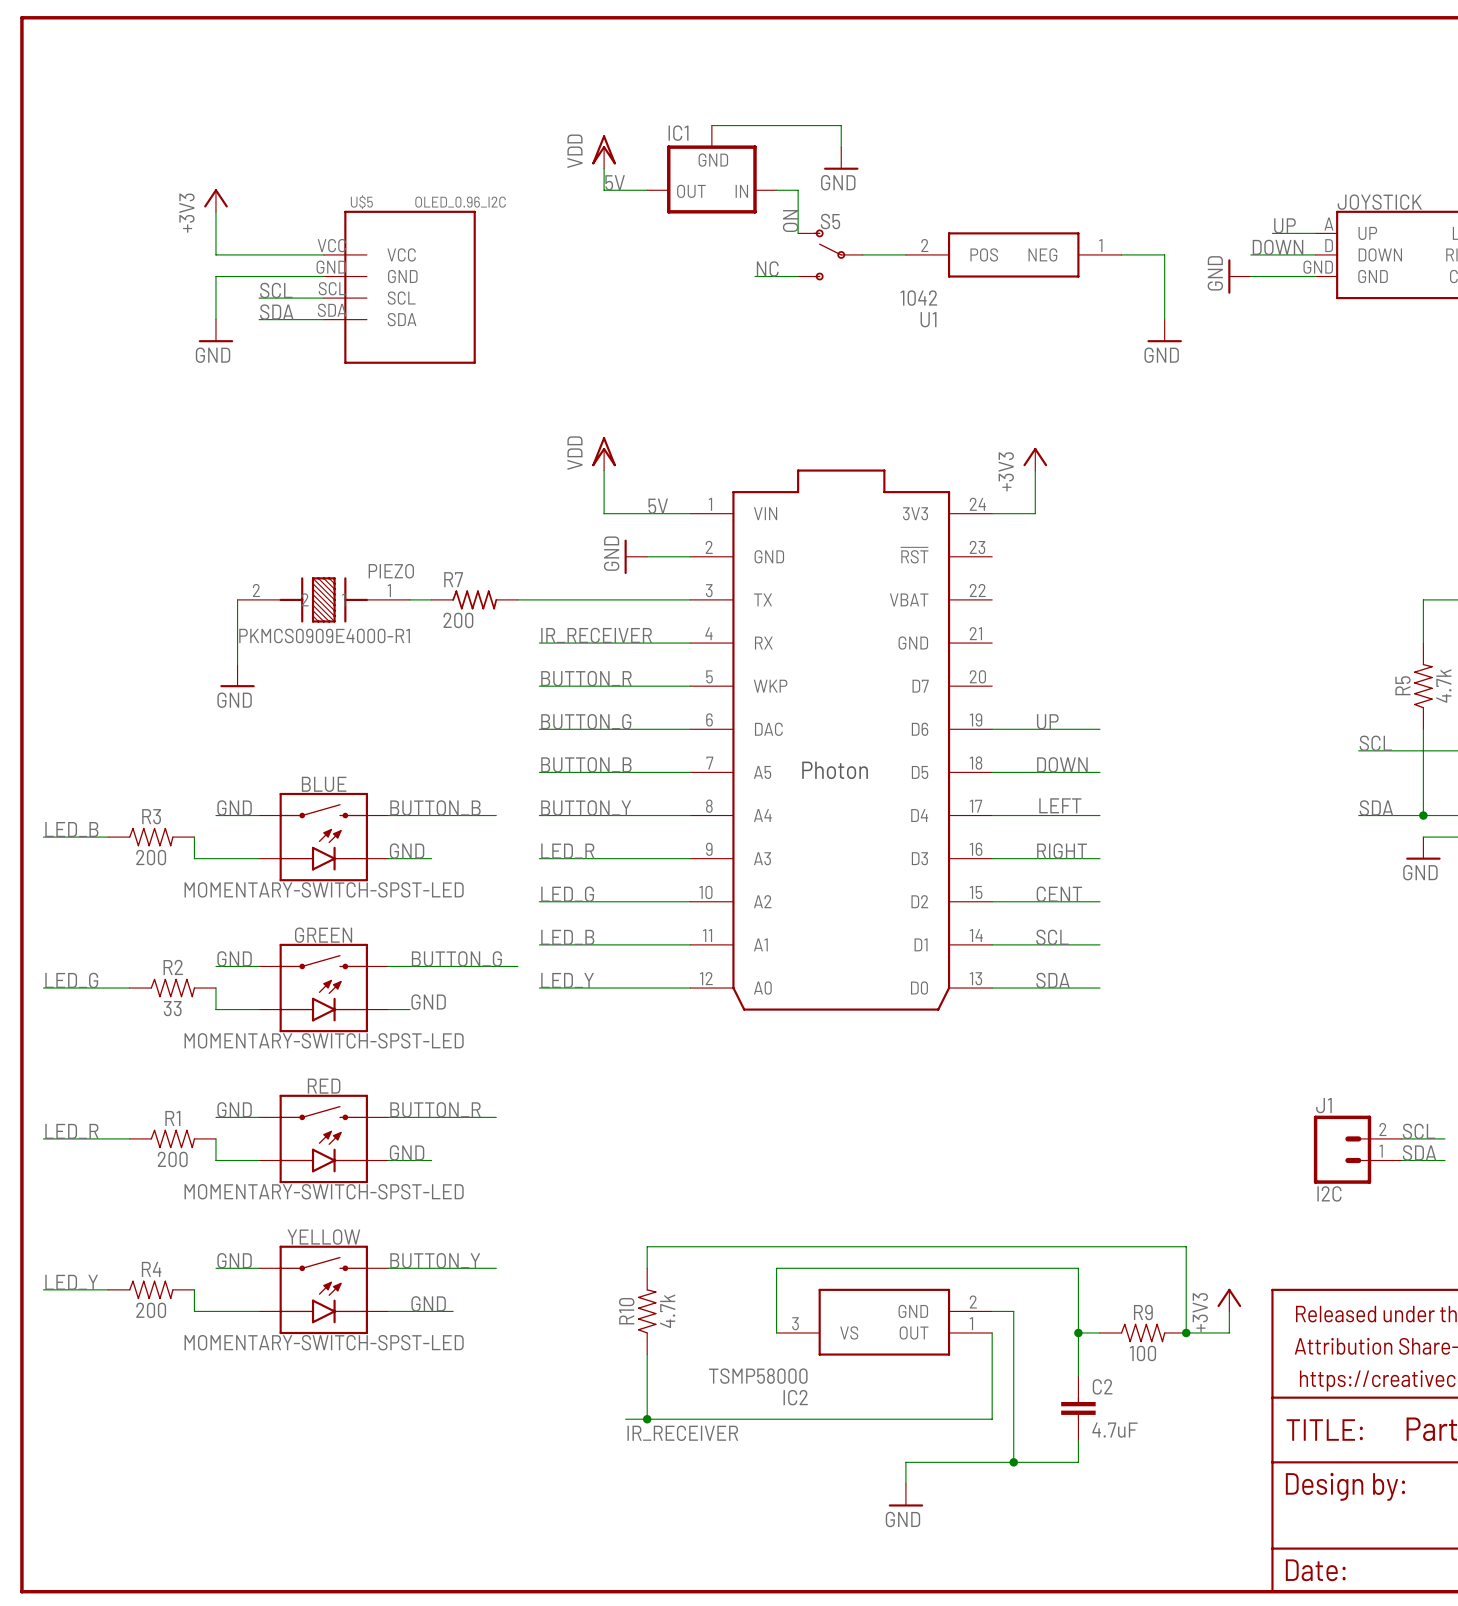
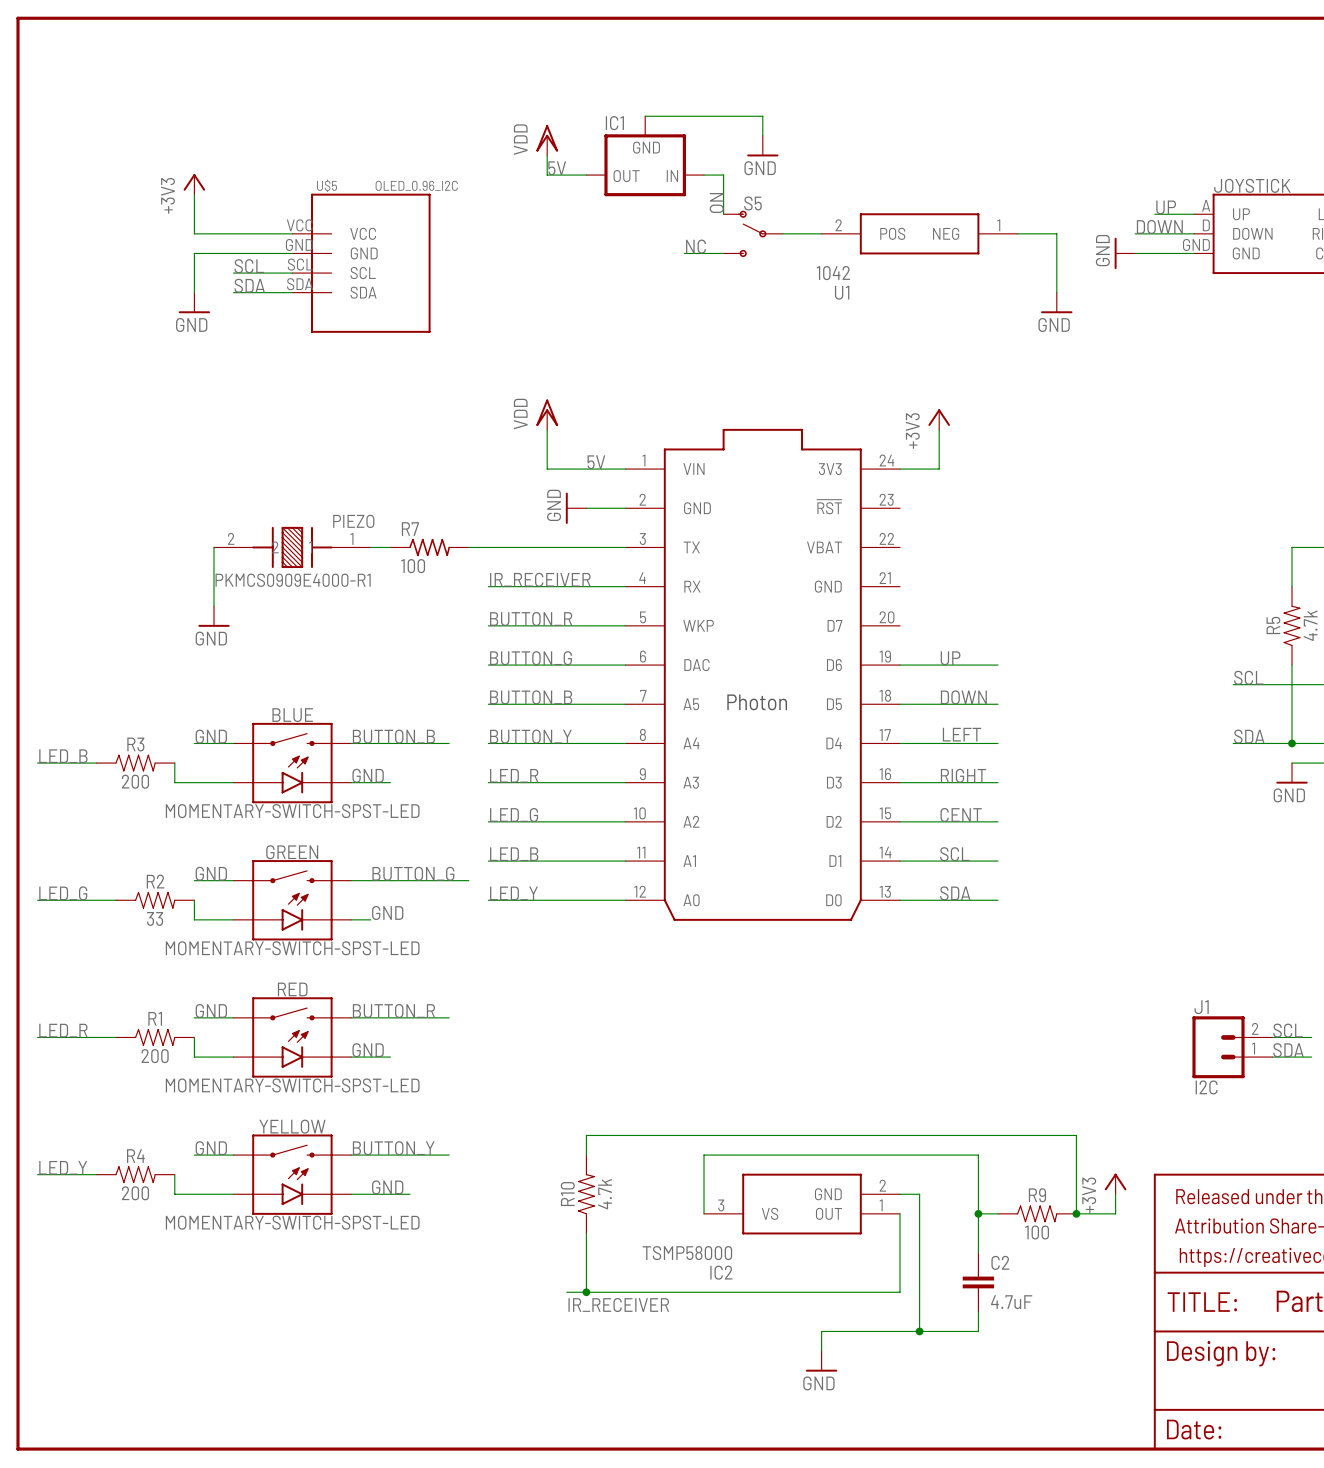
R7 value: 200 (458, 620) -> 100 (413, 566)

